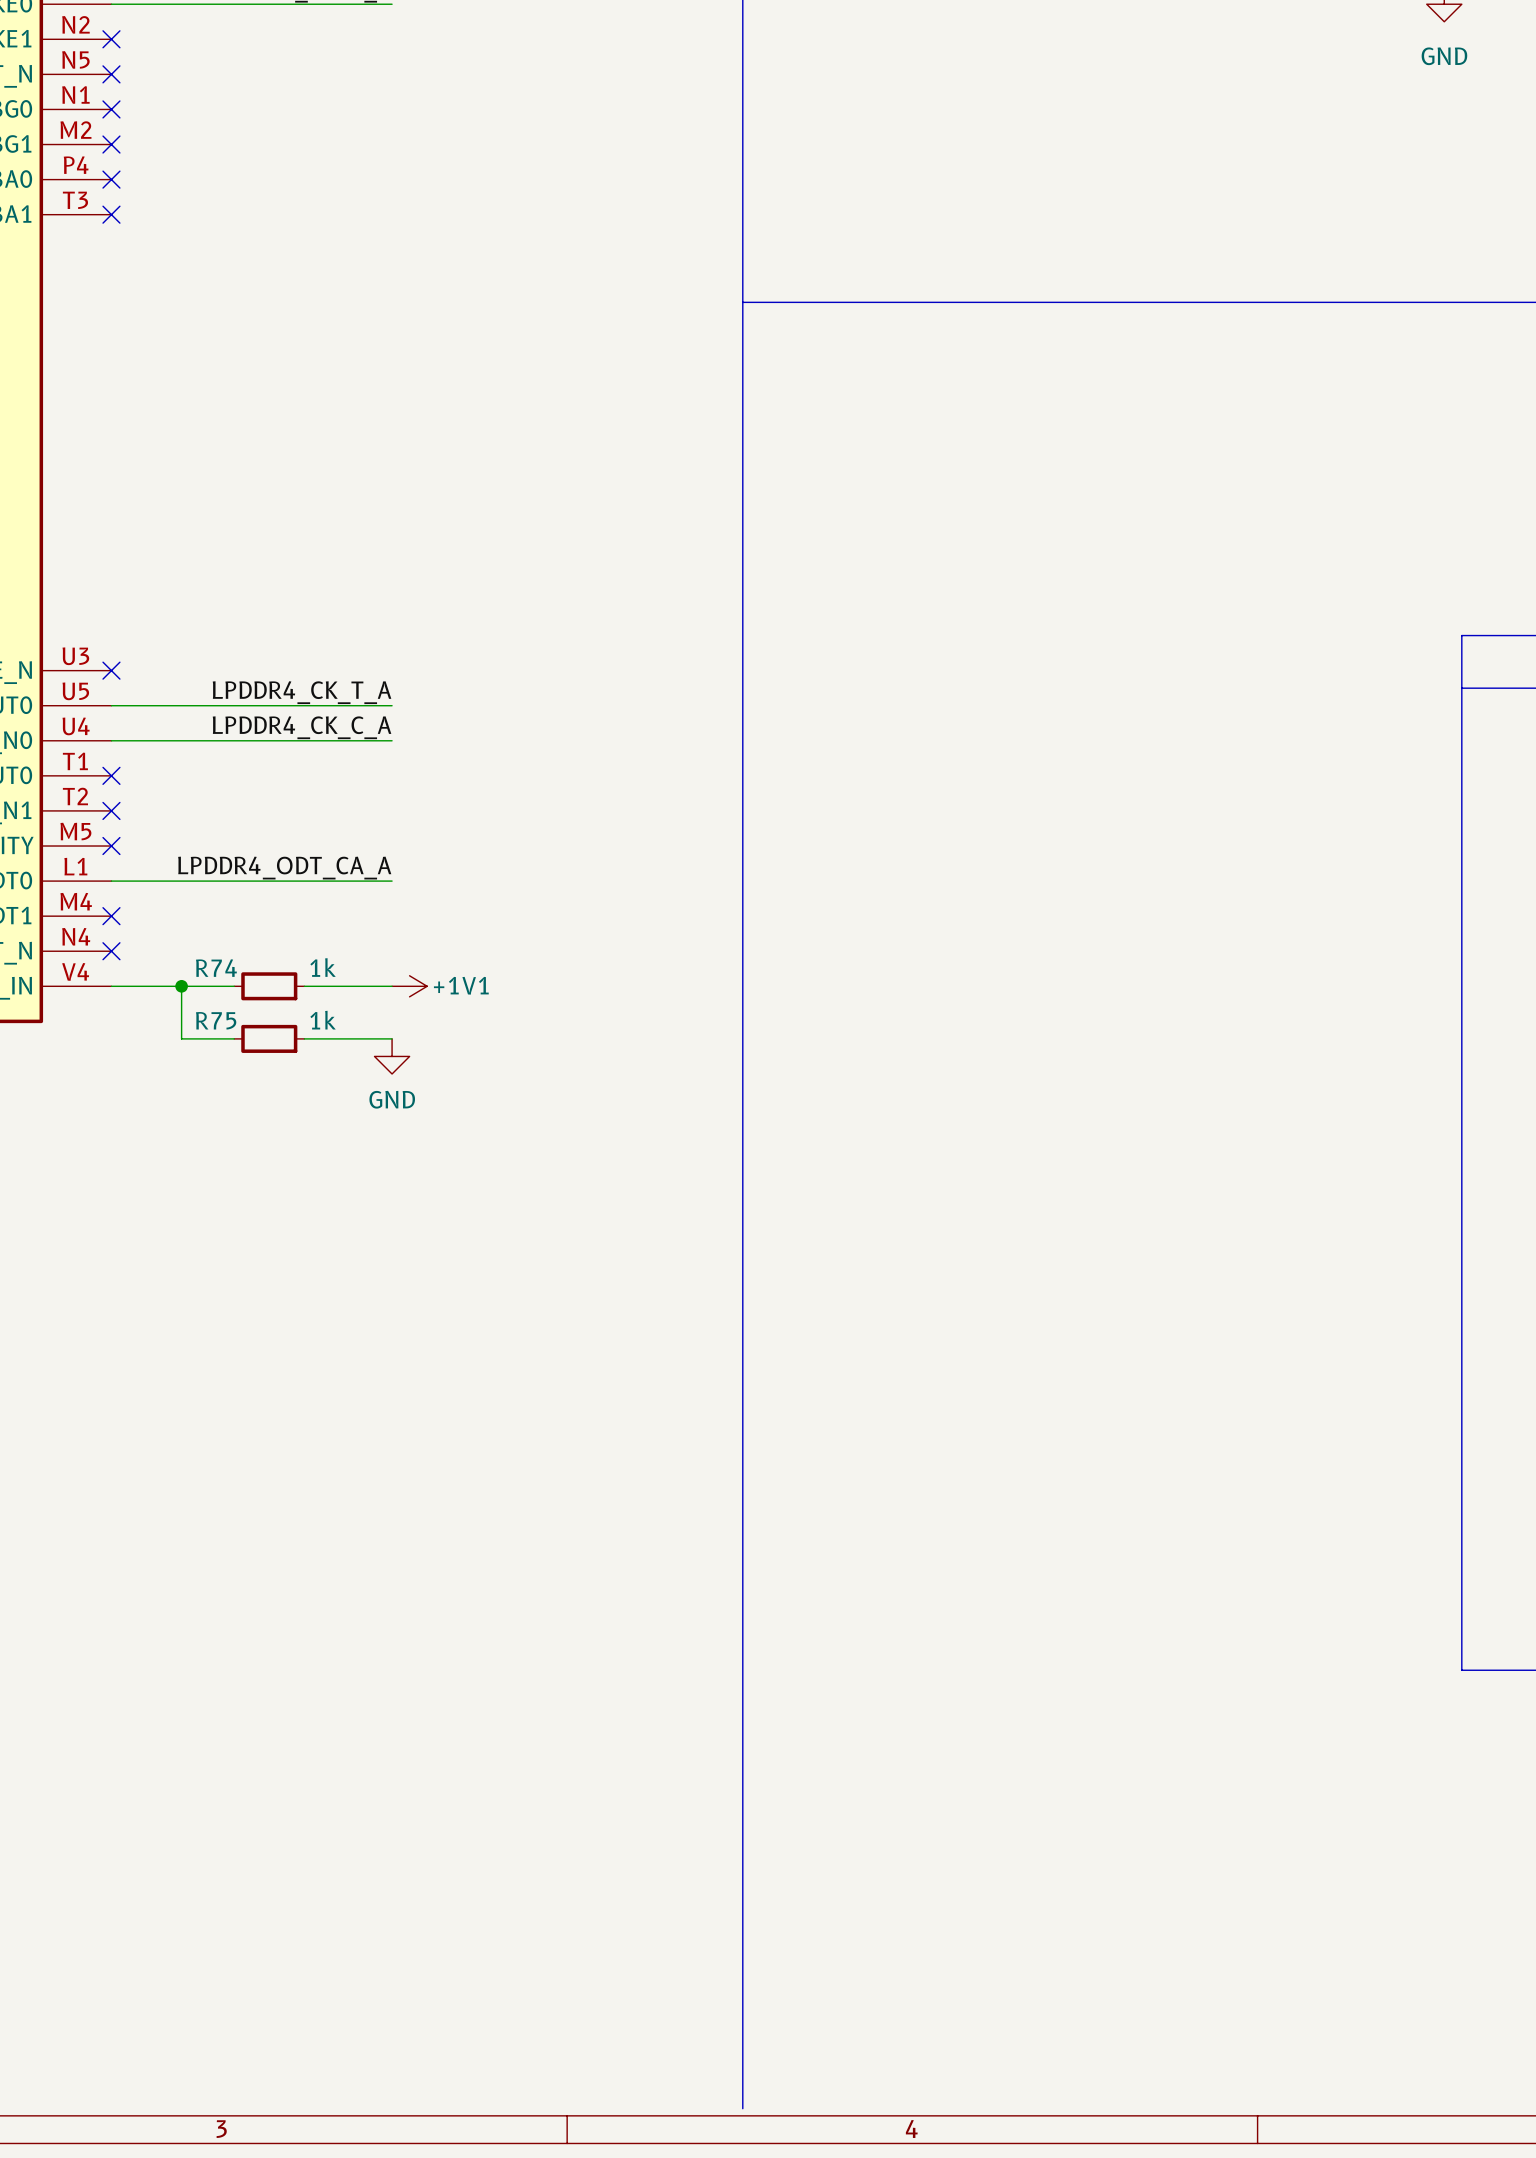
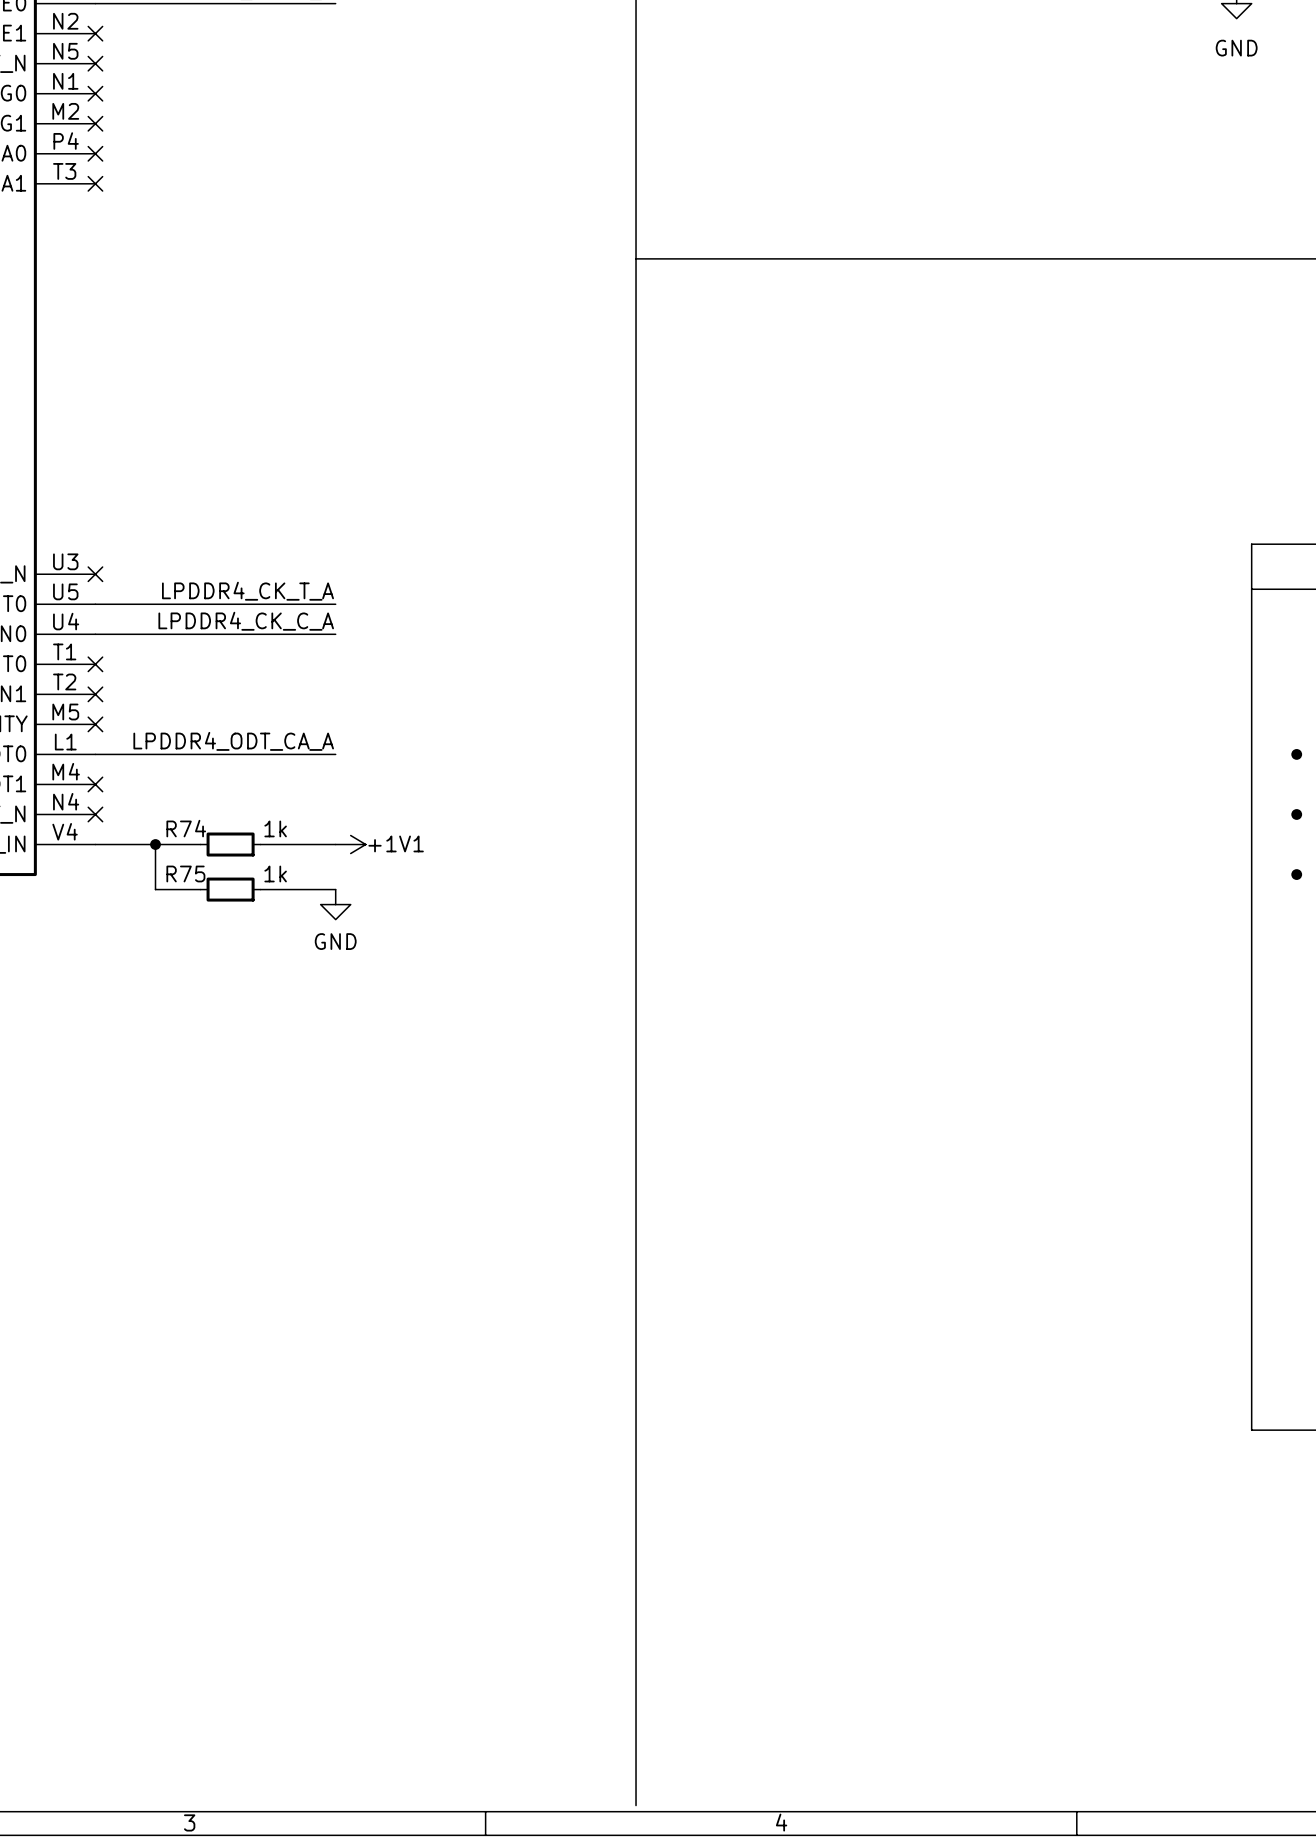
junction: none -> (1296, 754)
junction: none -> (1296, 814)
junction: none -> (1296, 874)

